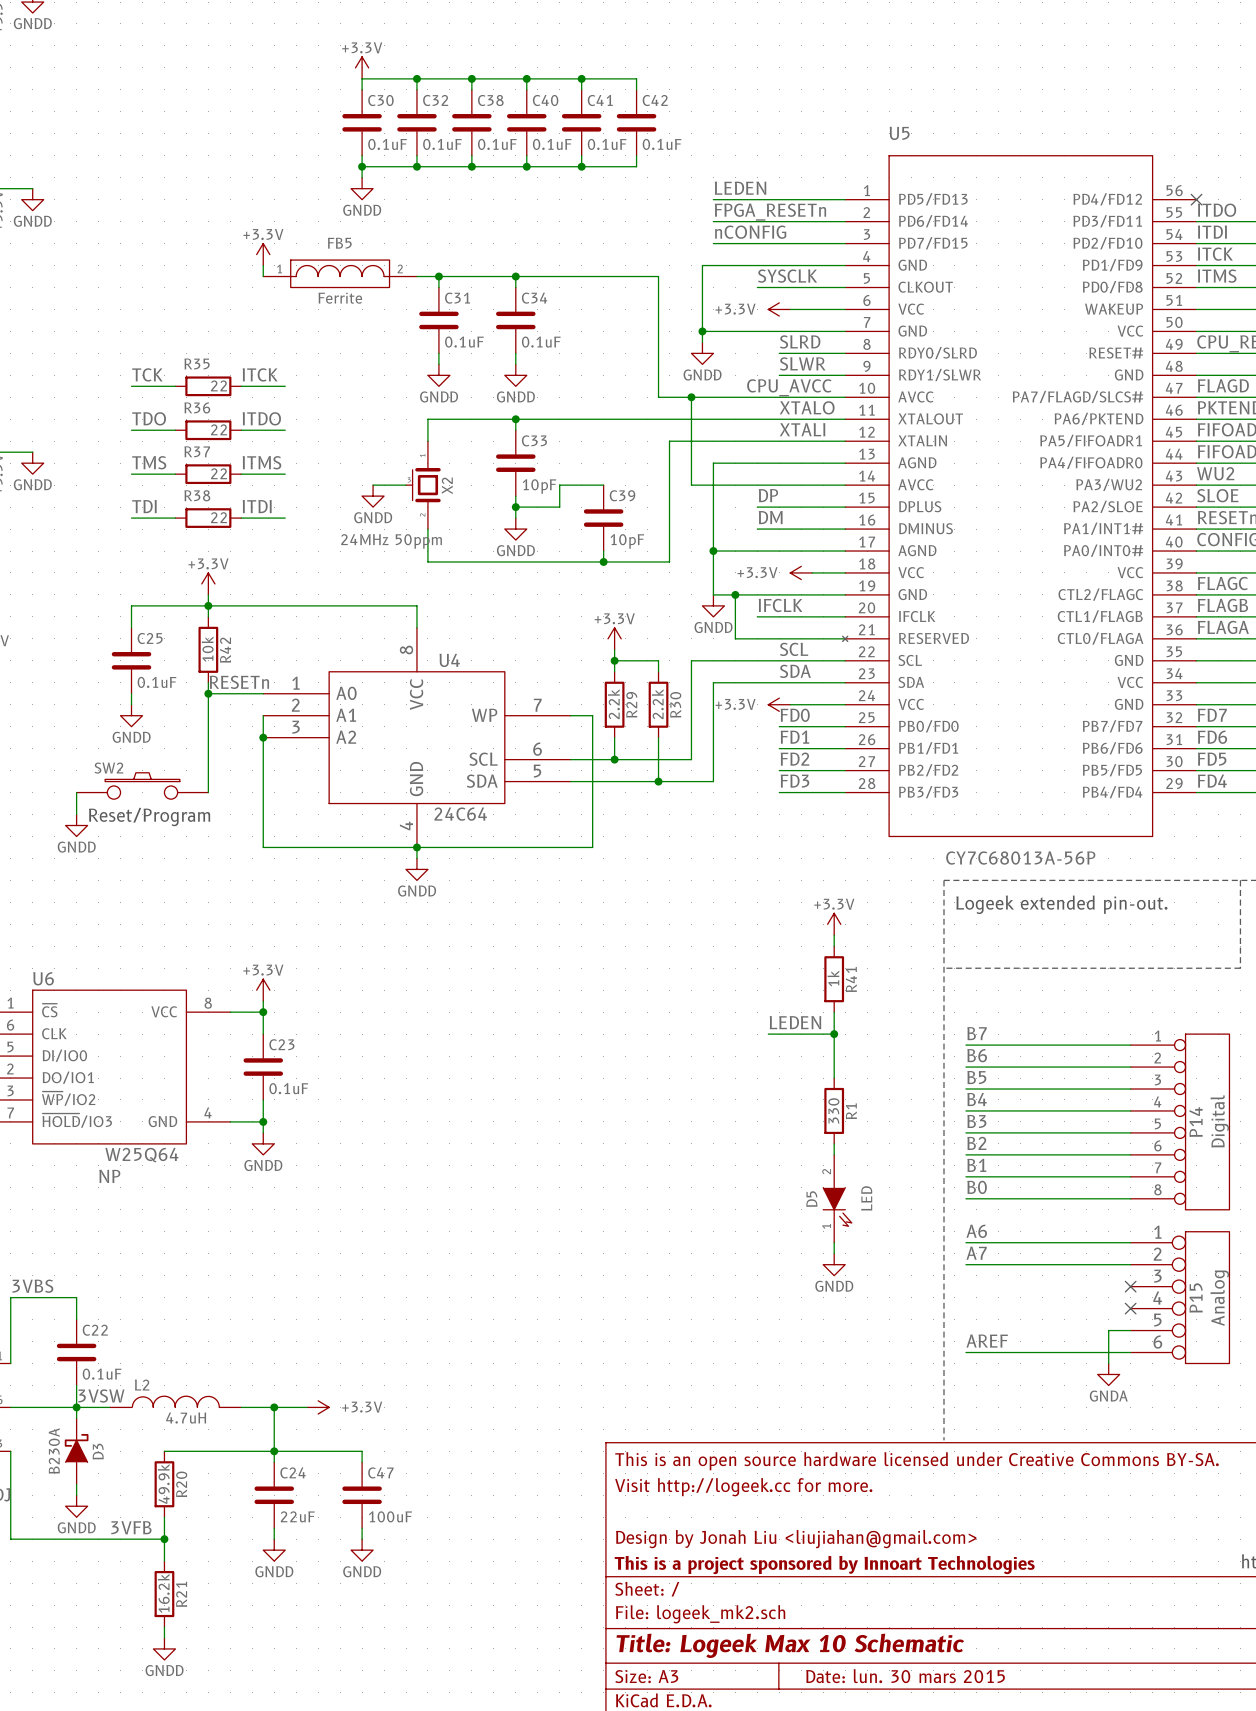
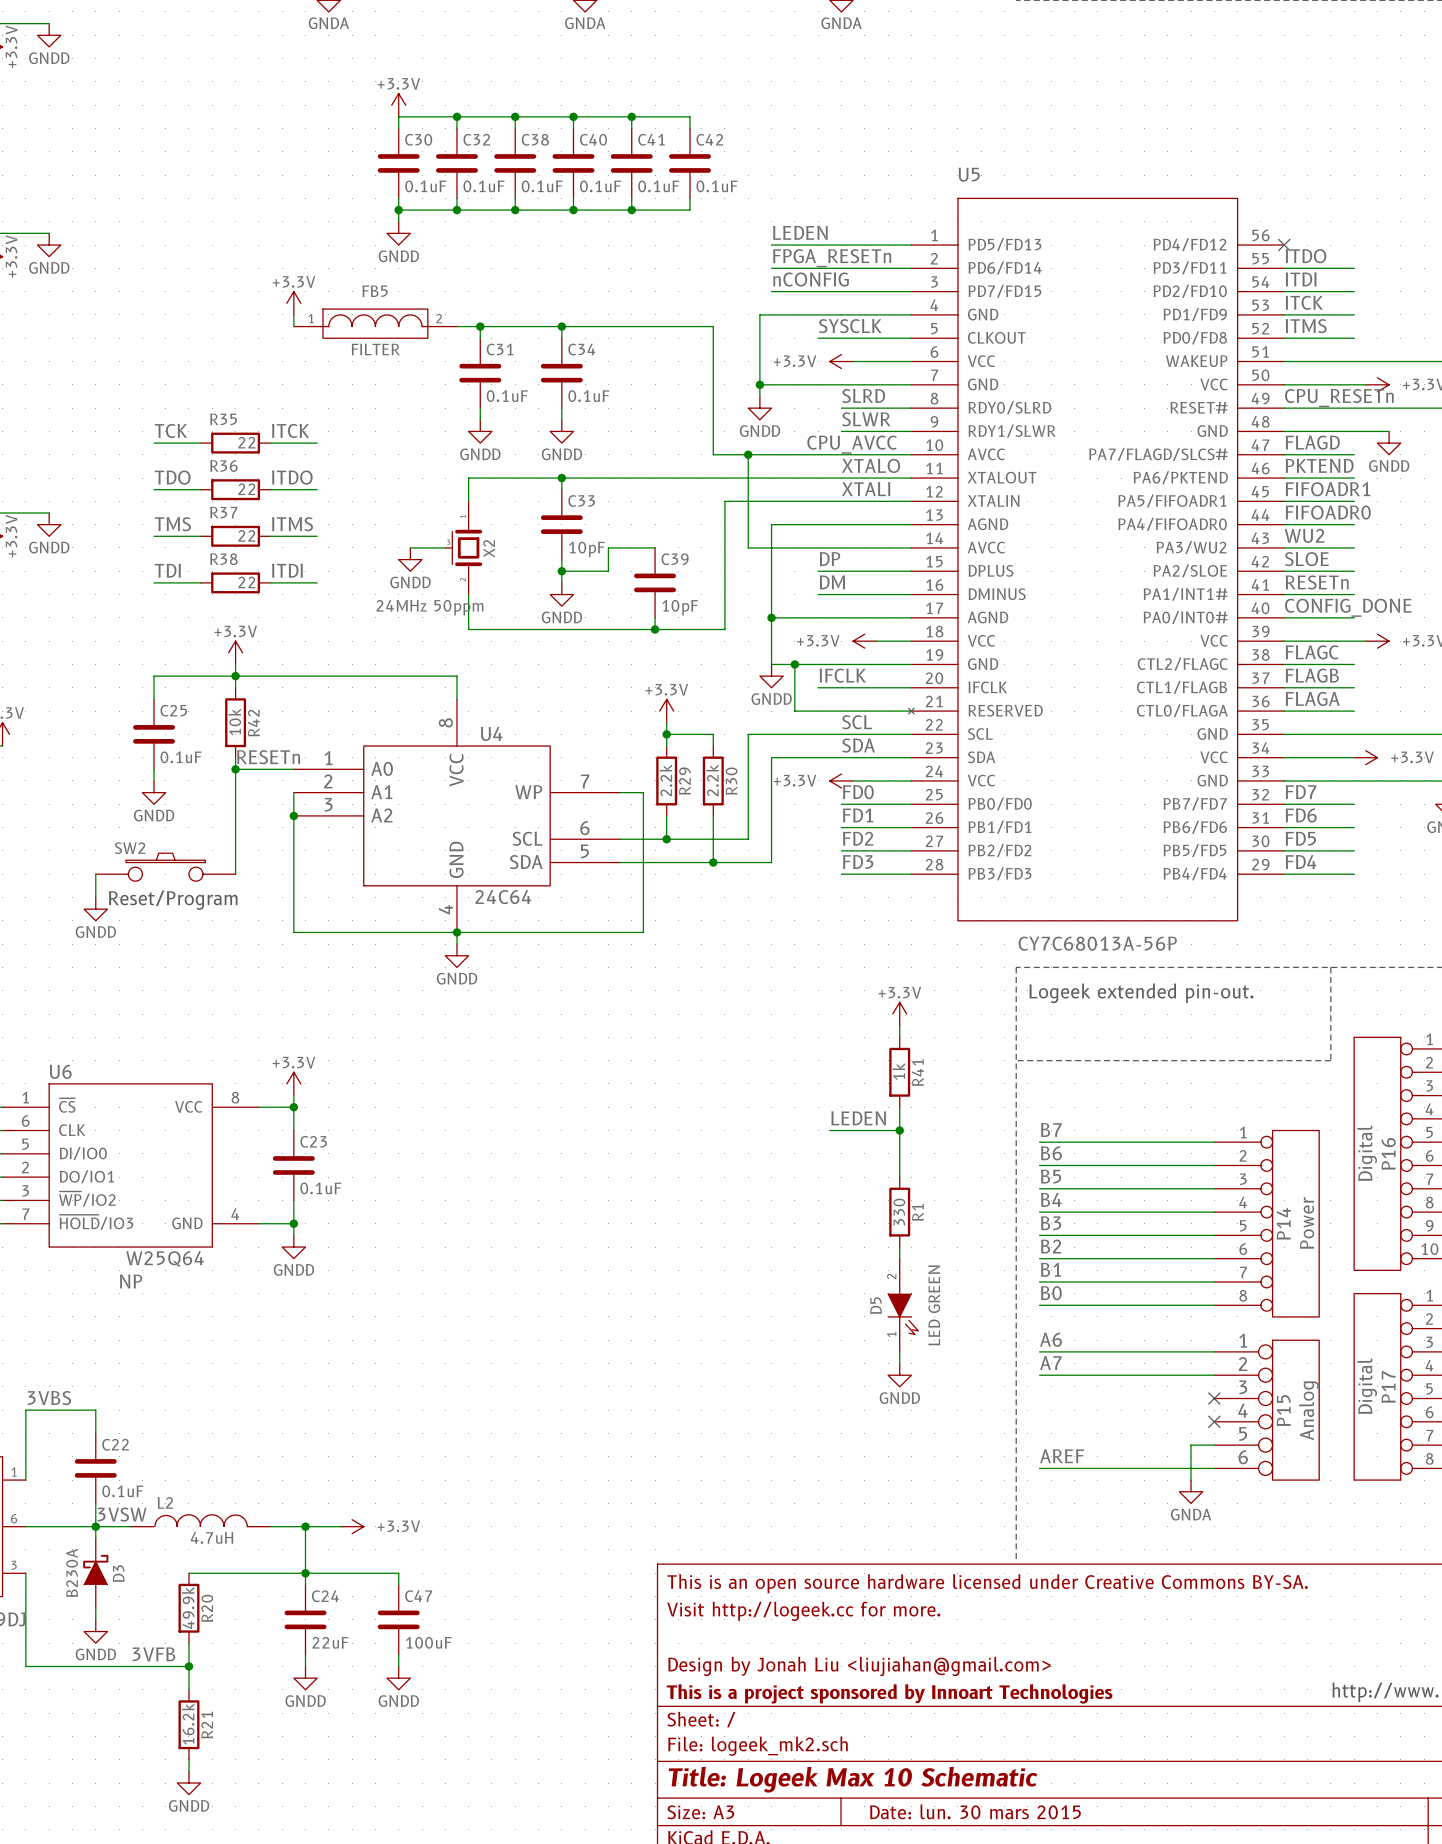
FB5 value: Ferrite (340, 298) -> FILTER (375, 349)
P14 value: Digital (1219, 1121) -> Power (1307, 1223)
D5 value: LED (866, 1198) -> LED GREEN (934, 1305)

